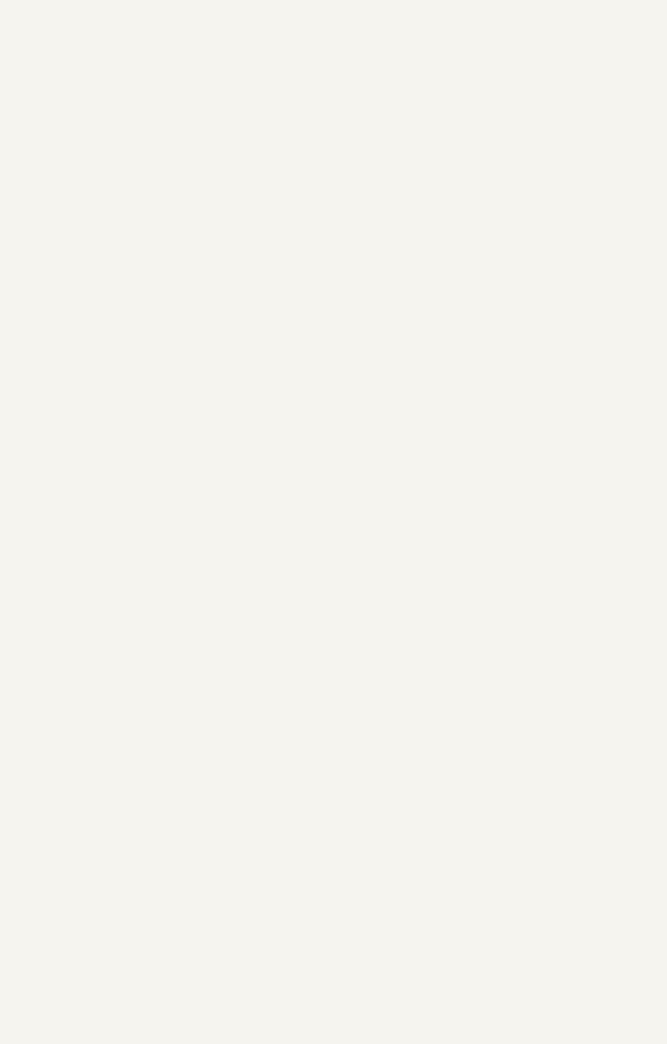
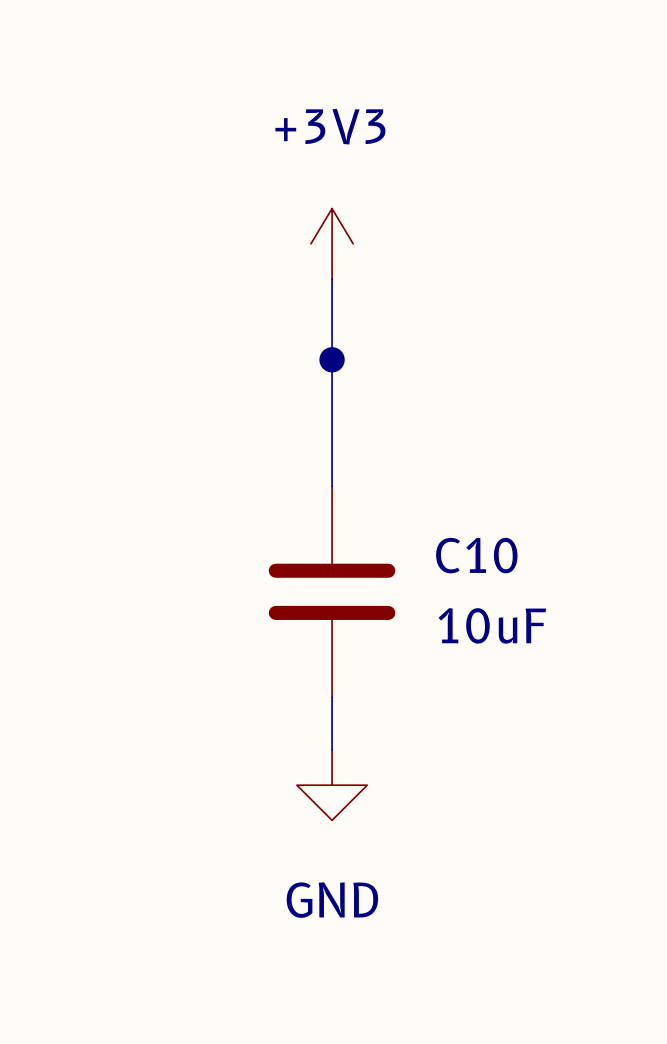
power symbol: none -> +3V3 (332, 243)
wire: none -> (332, 278) (332, 486)
junction: none -> (332, 359)
C10: none -> 10uF (332, 591)
wire: none -> (332, 697) (332, 750)
power symbol: none -> GND (332, 785)

